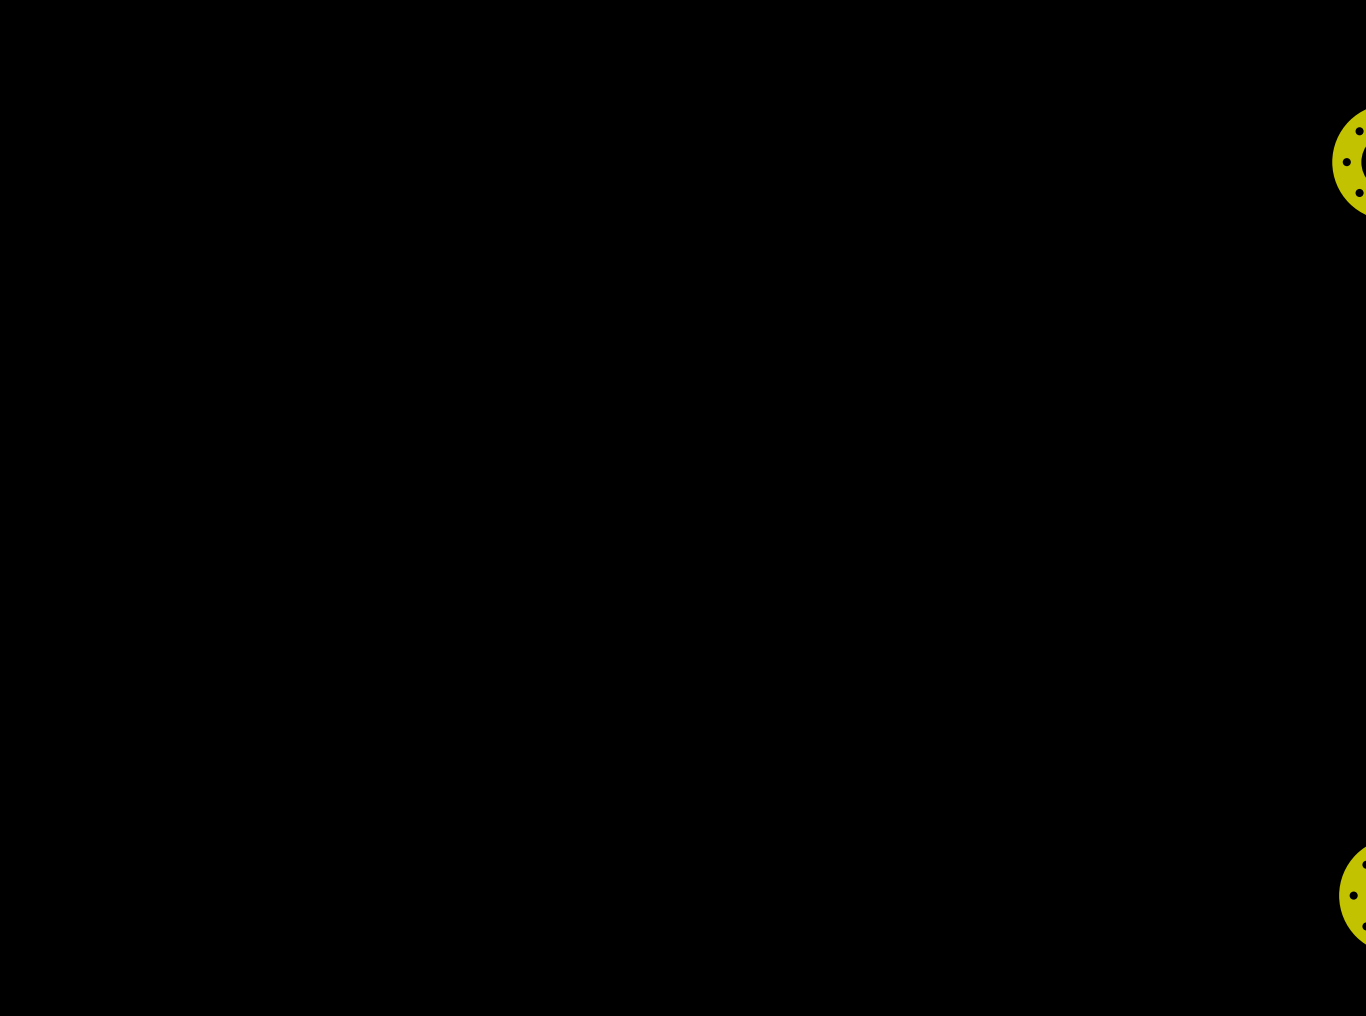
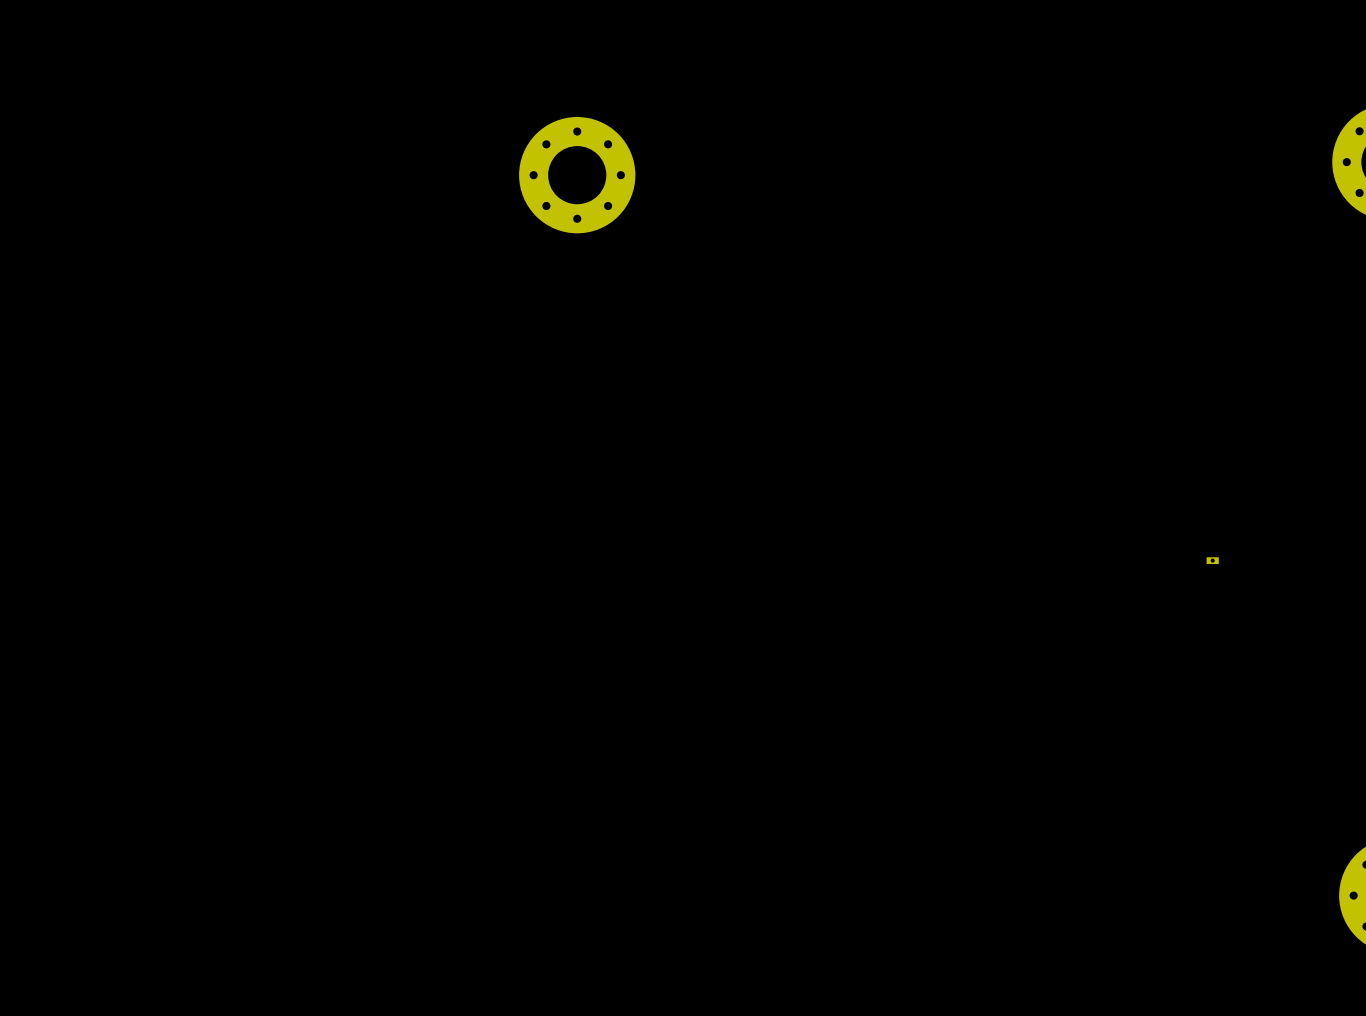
part: none -> (577, 175)
part: none -> (1212, 560)

